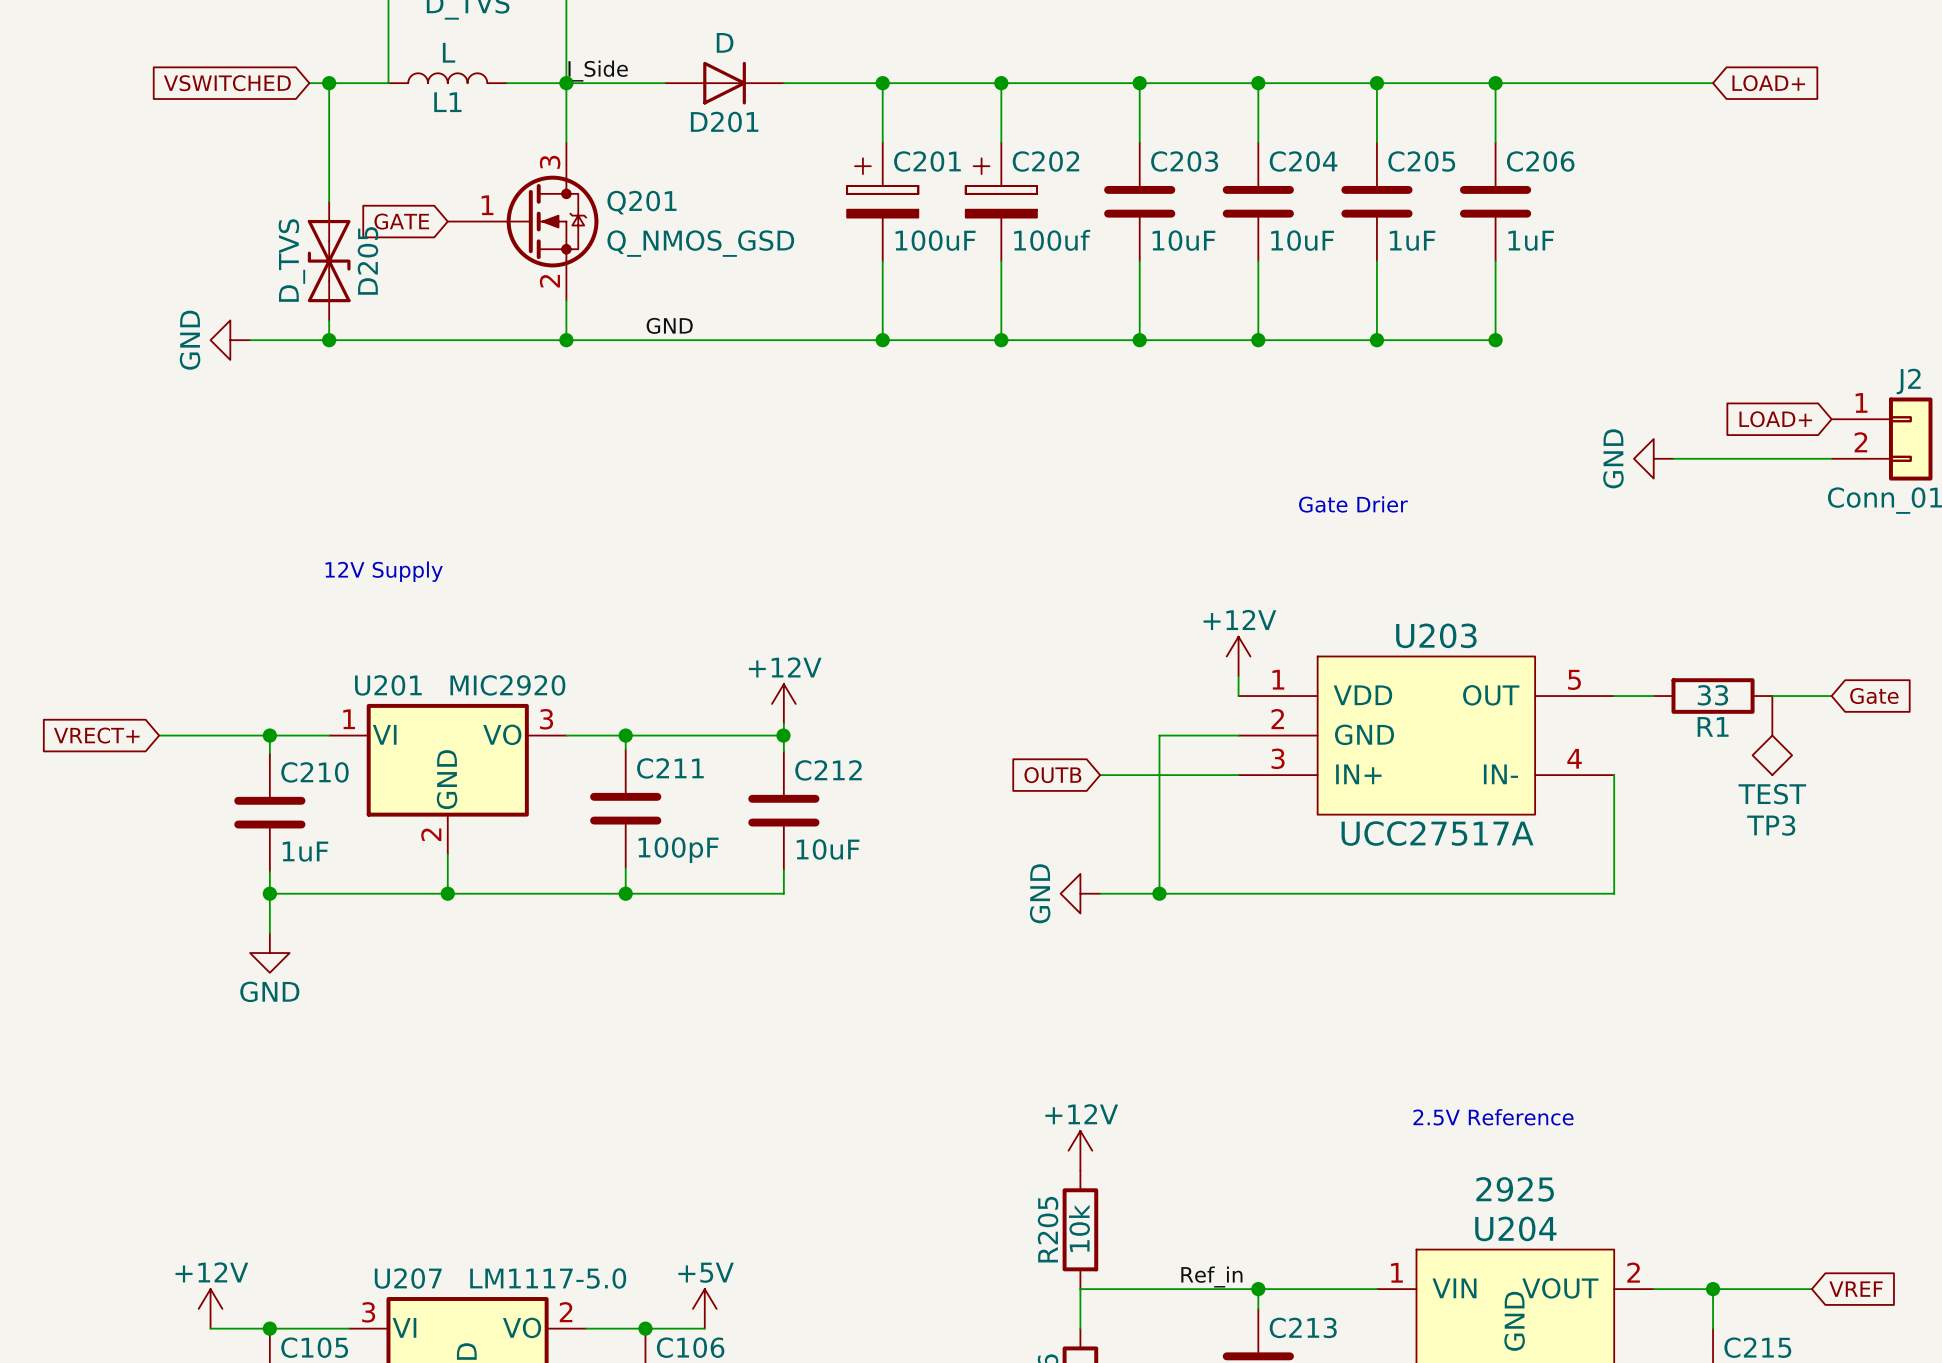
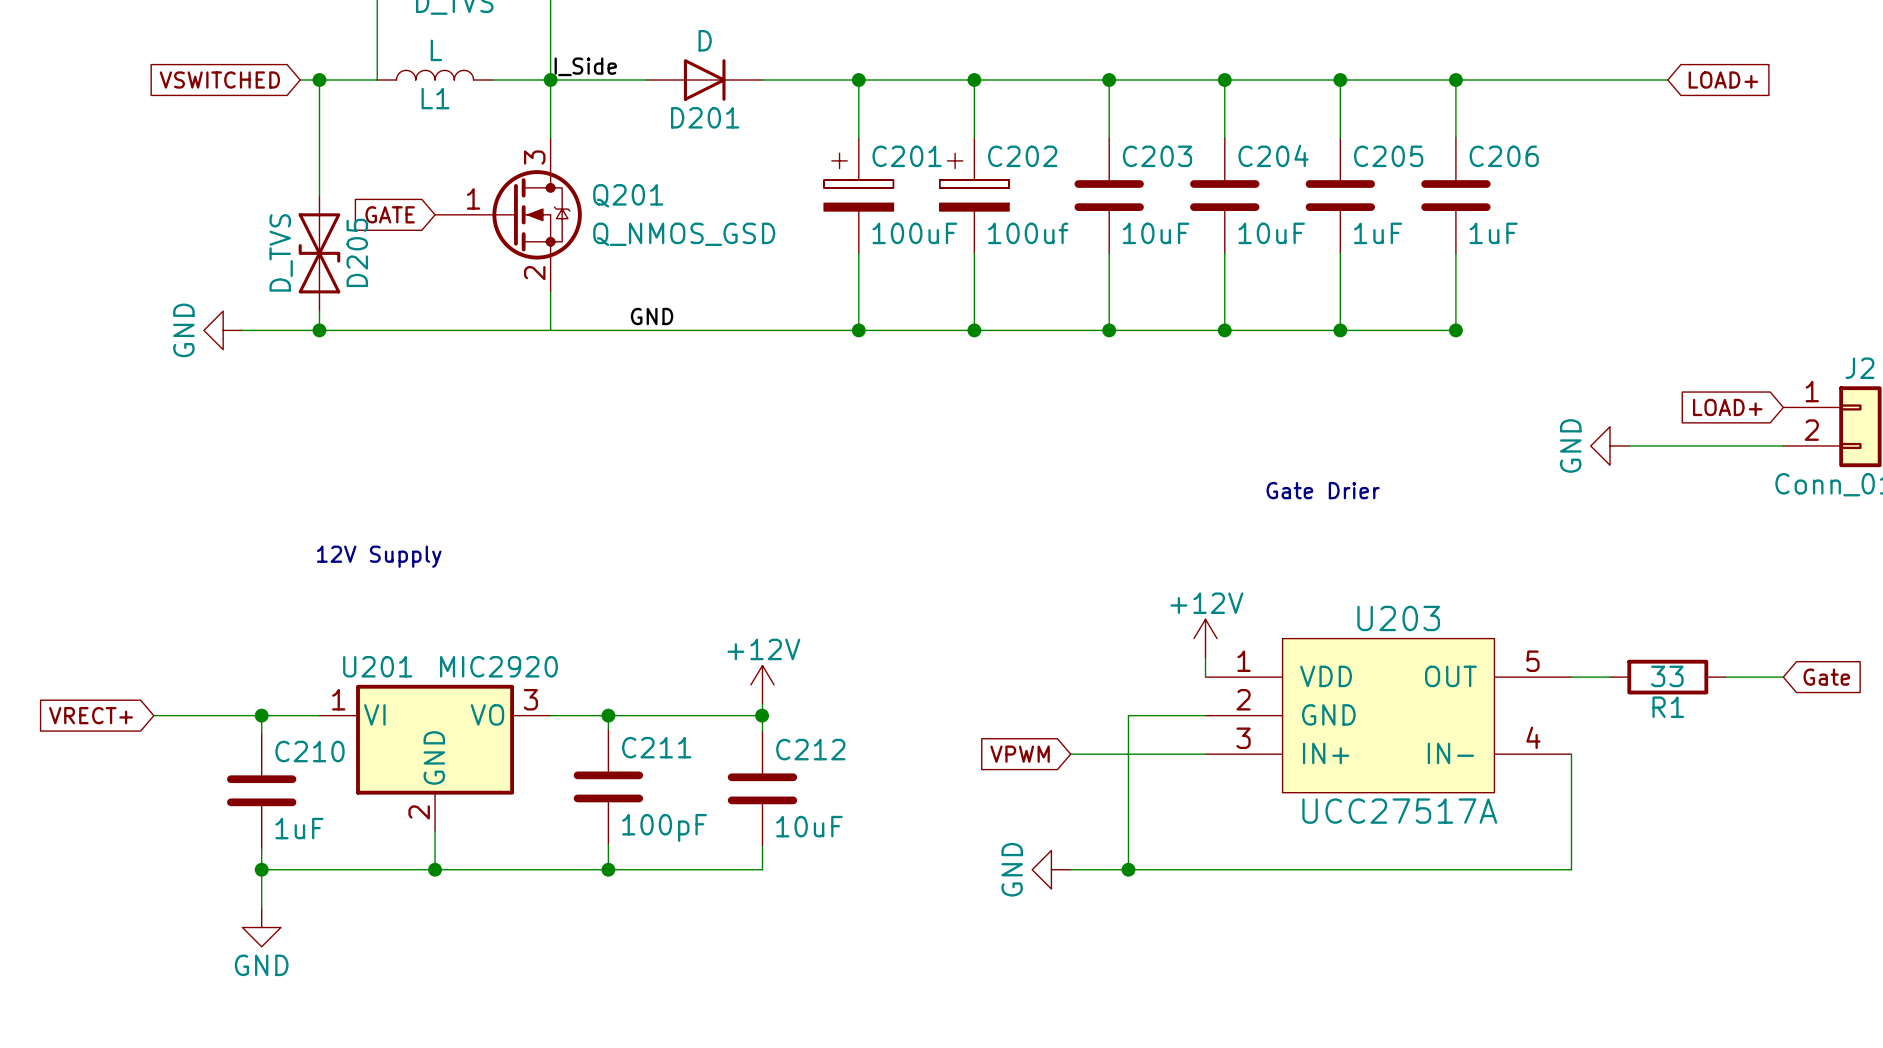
junction: (566, 340) -> none
TP3: TEST (1772, 735) -> none
global label: OUTB (1052, 775) -> VPWM (1020, 754)

